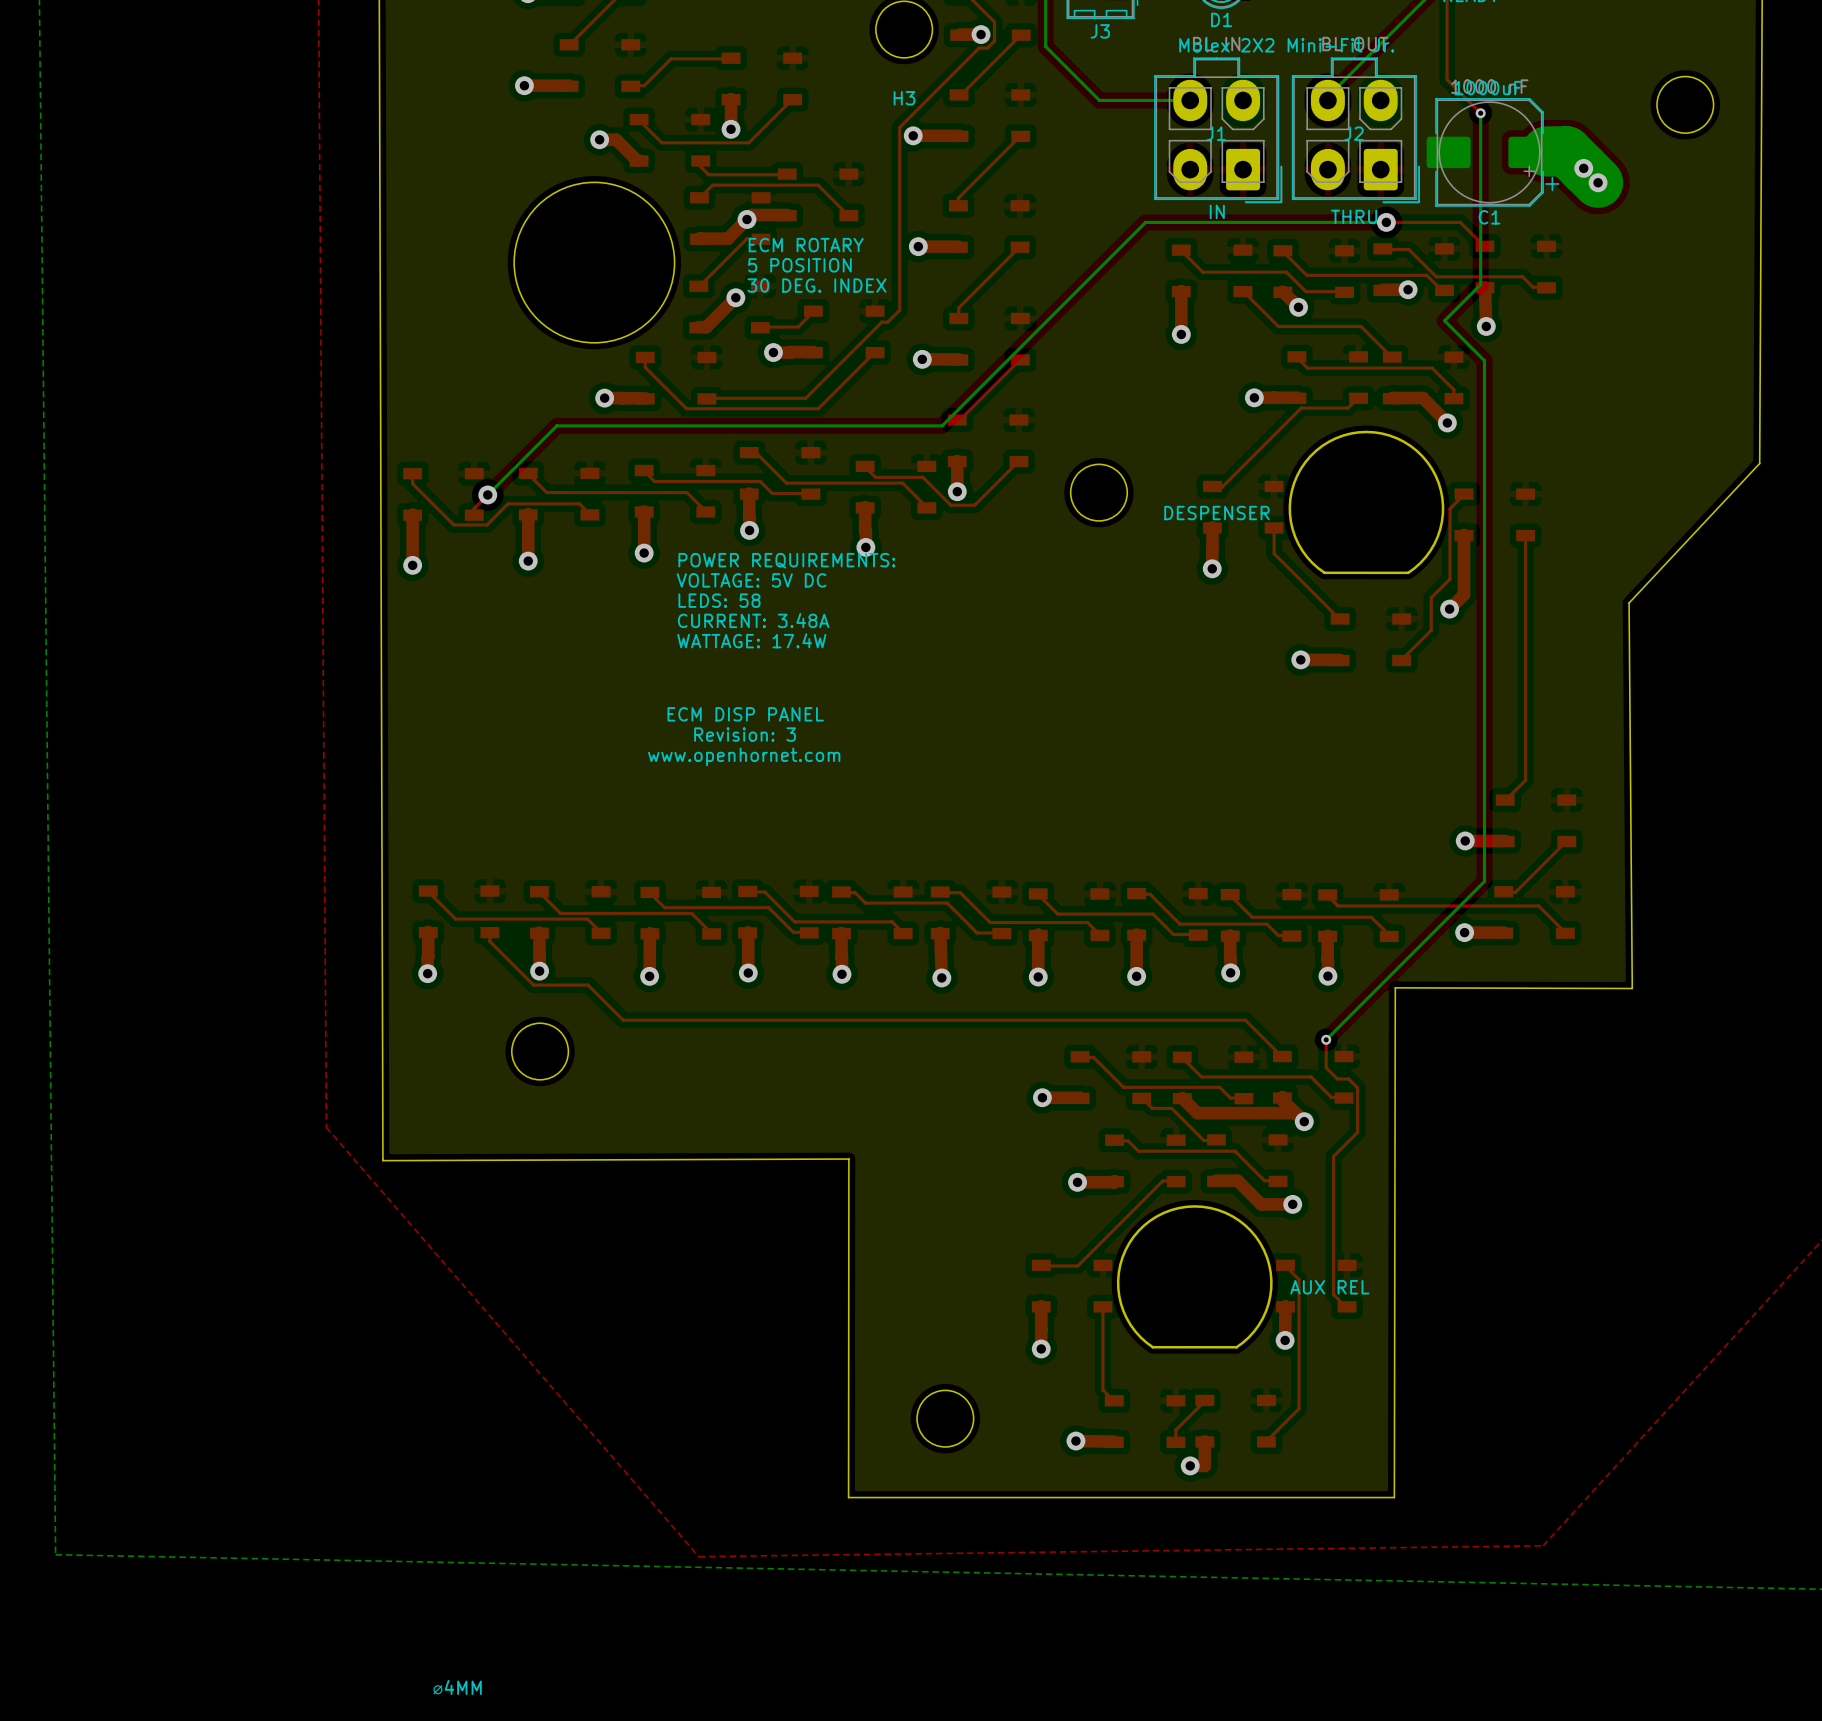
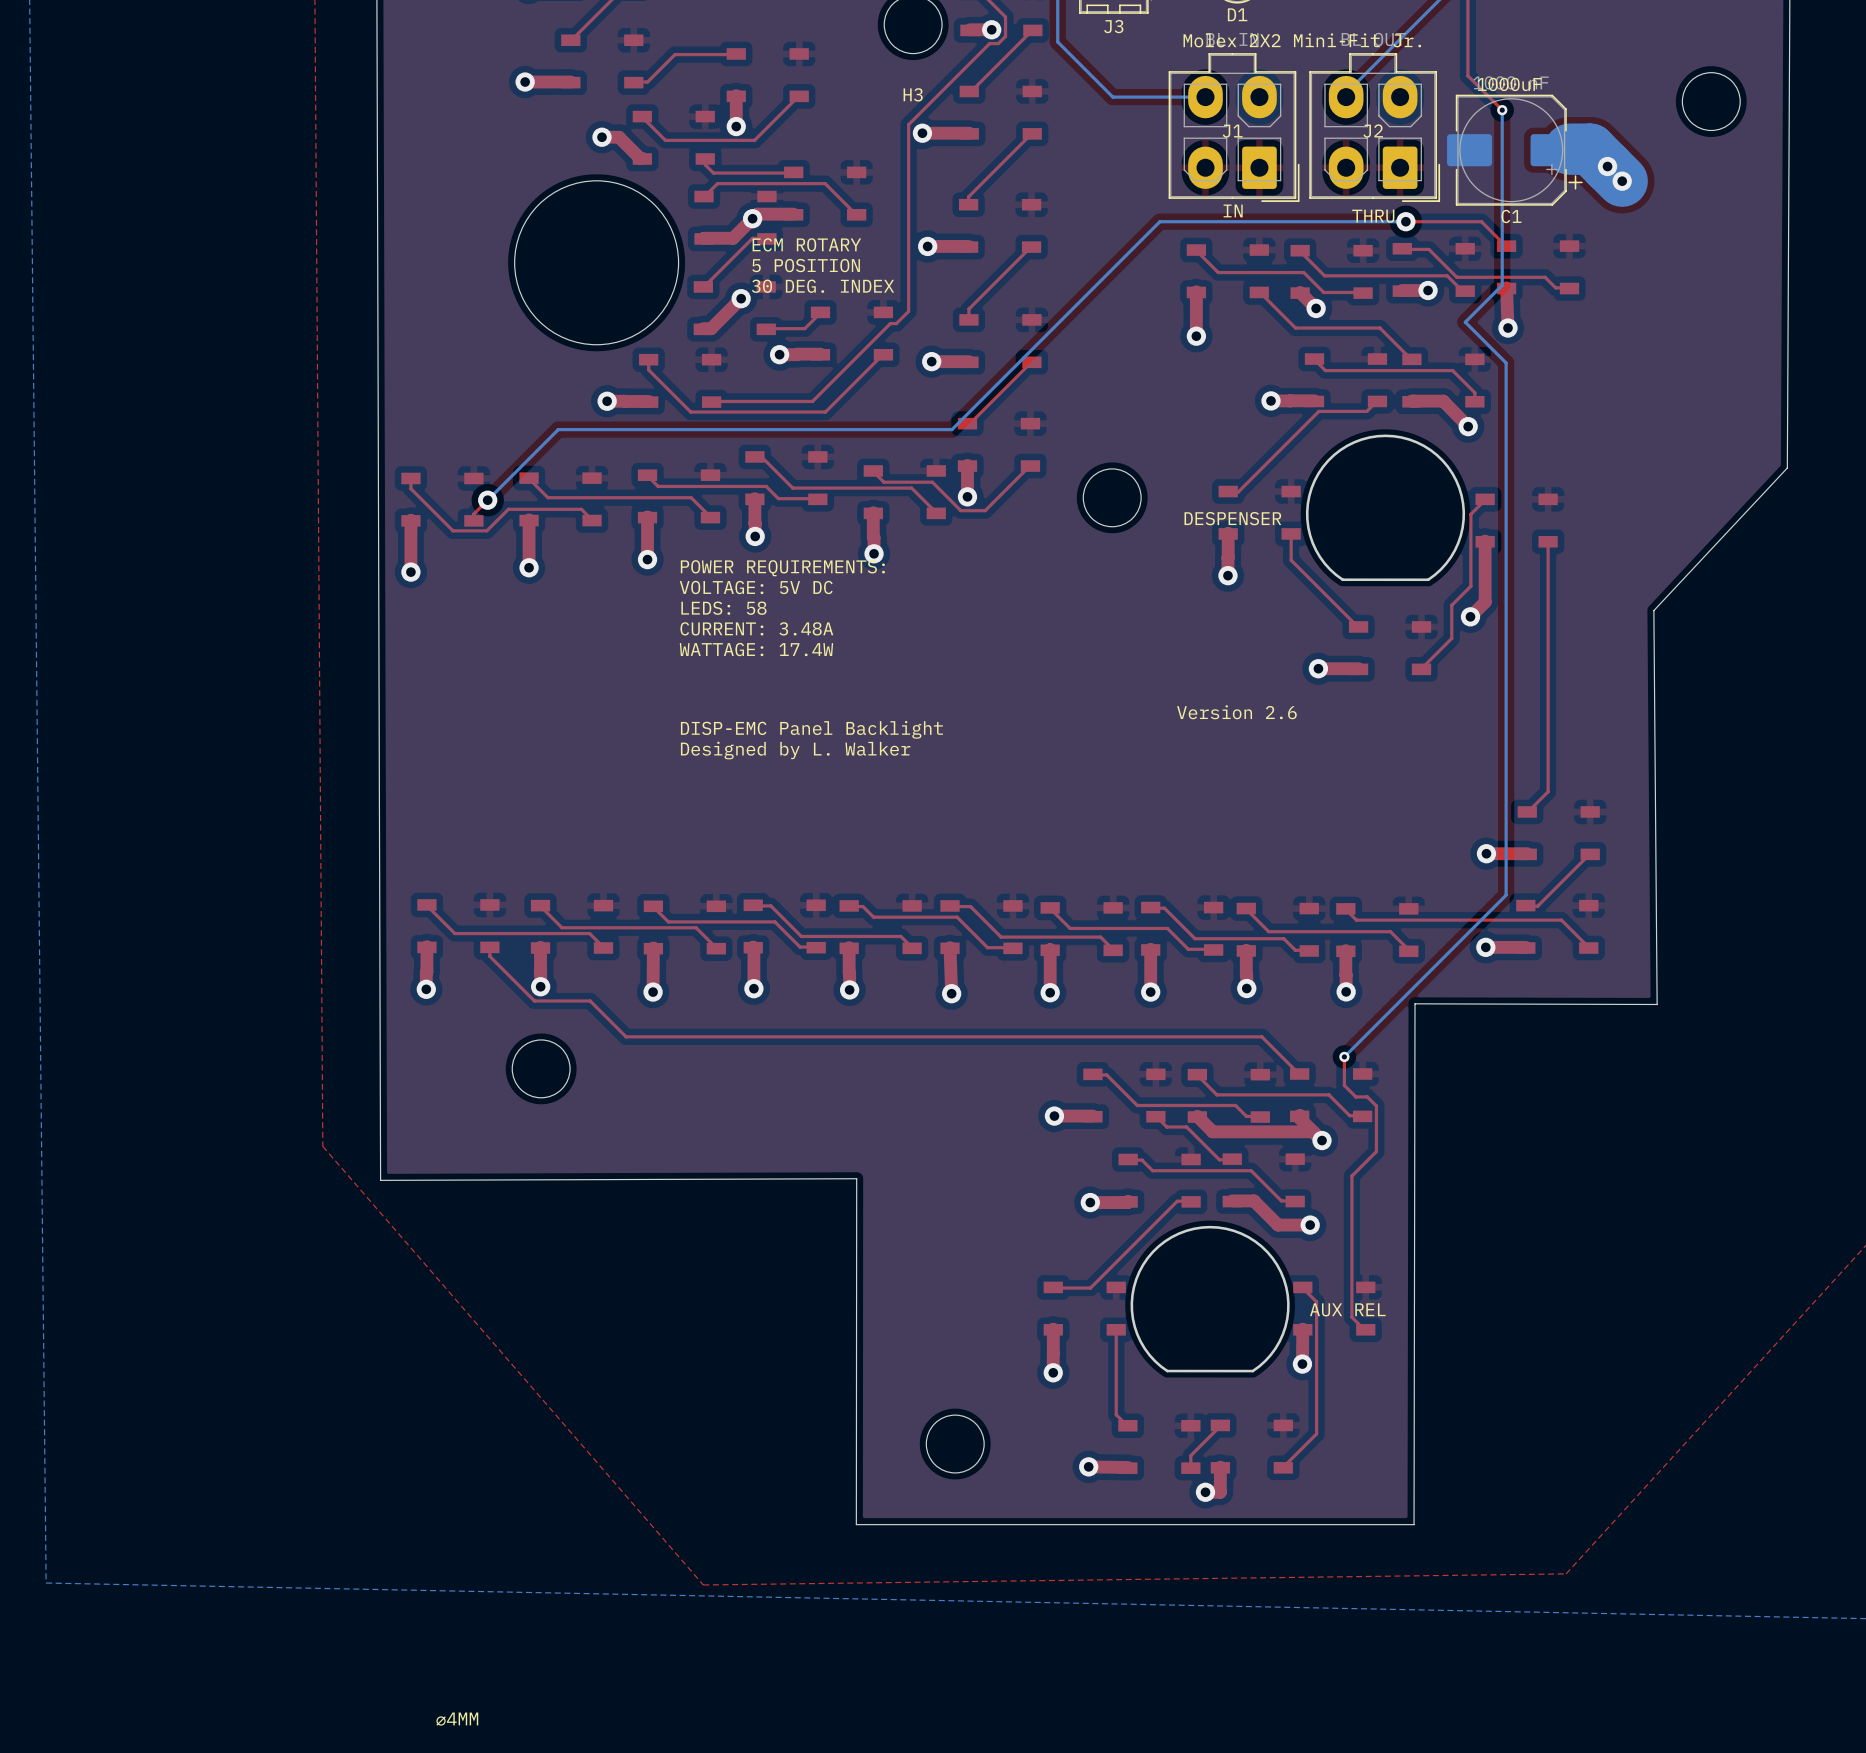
text: none -> Version 2.6 (1236, 712)
text: ECM DISP PANEL (745, 714) -> none
text: none -> DISP-EMC Panel Backlight (811, 729)
text: Revision: 3 (745, 734) -> none
text: none -> Designed by L. Walker (795, 750)
text: www.openhornet.com (744, 756) -> none

